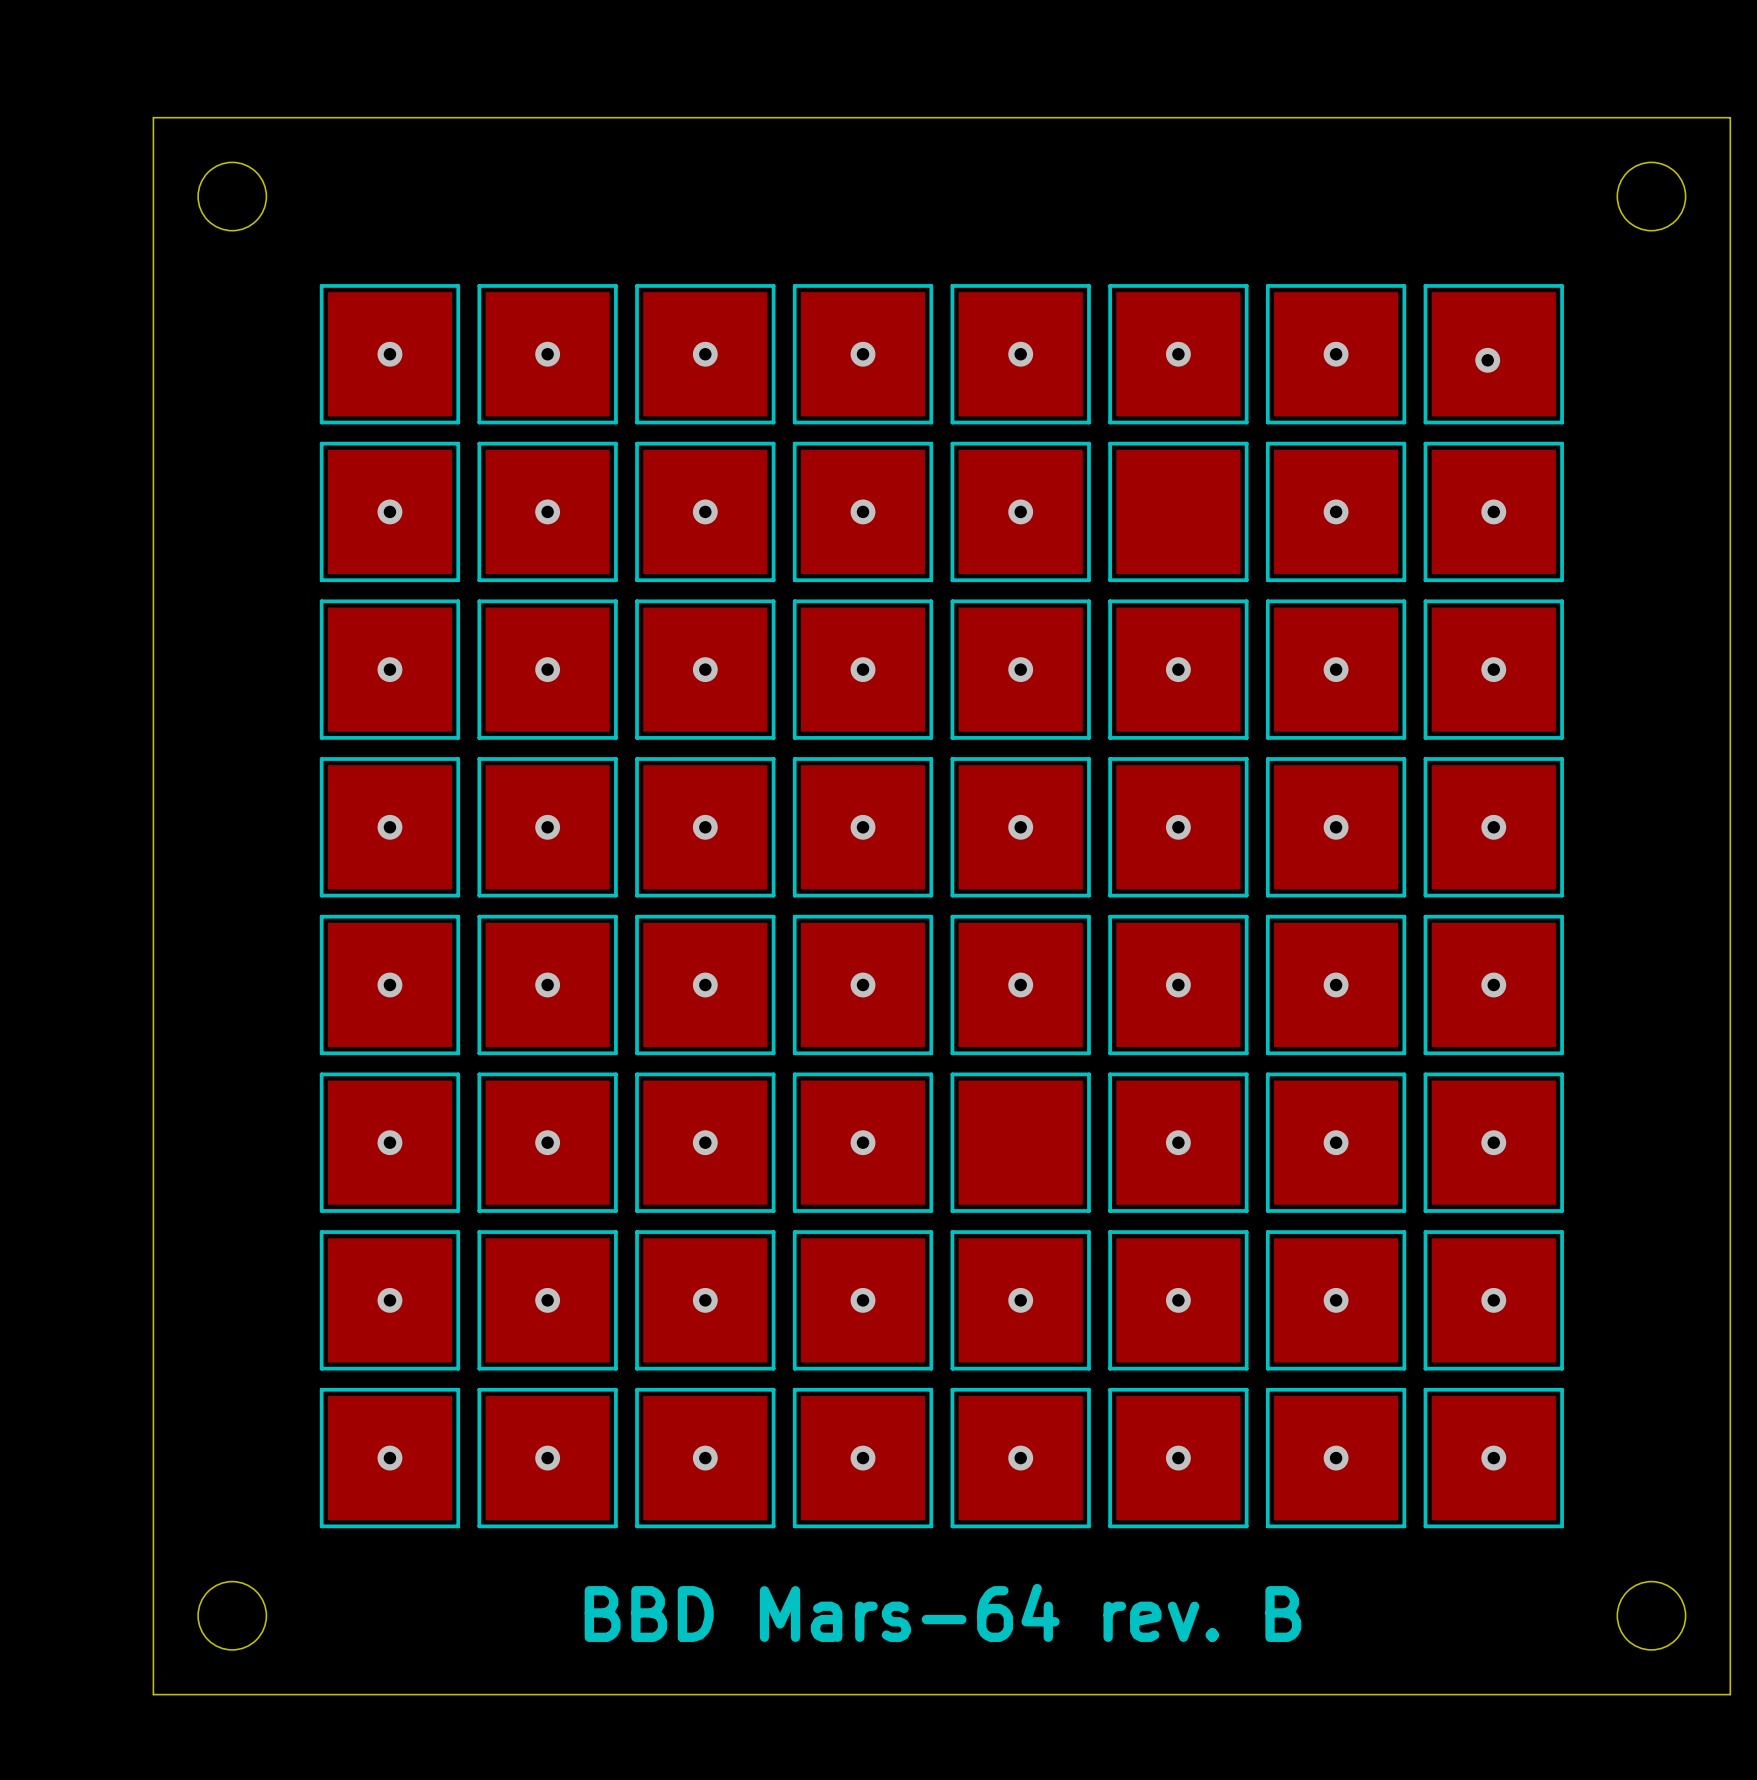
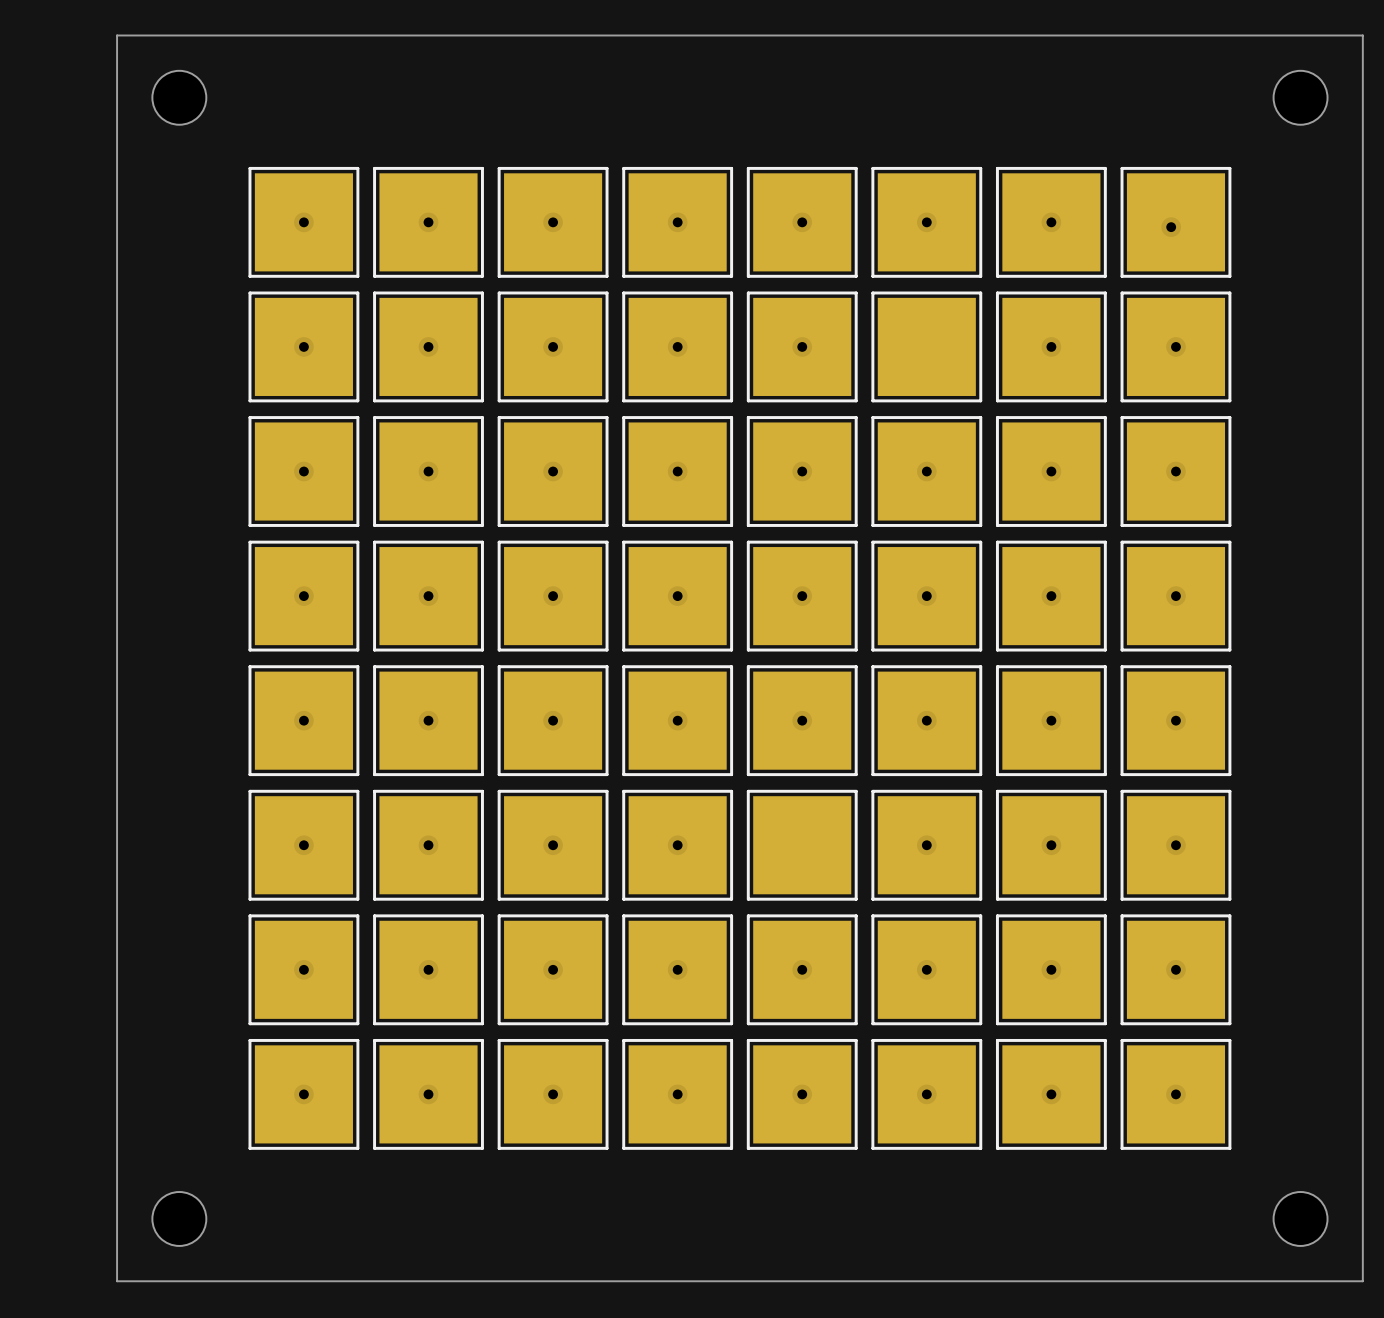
text: BBD Mars-64 rev. B (942, 1612) -> none

